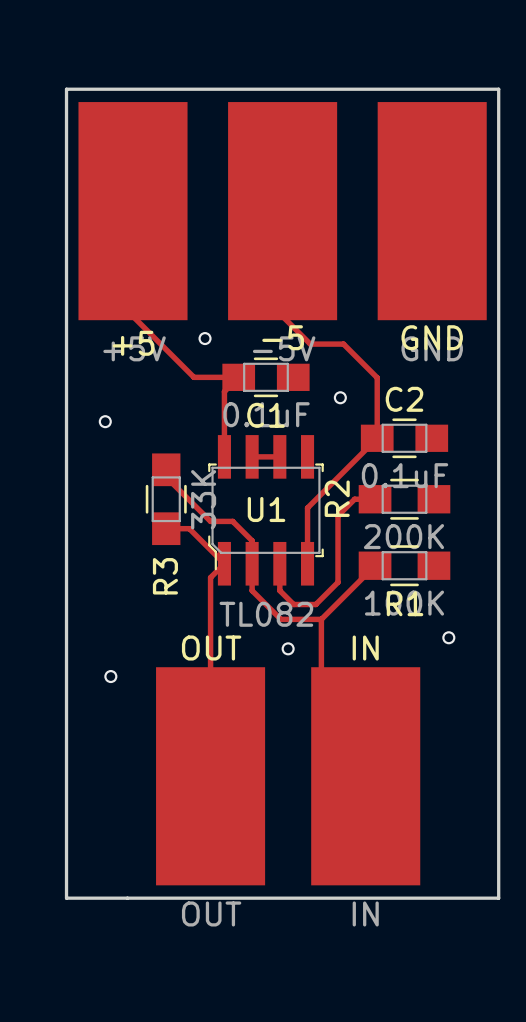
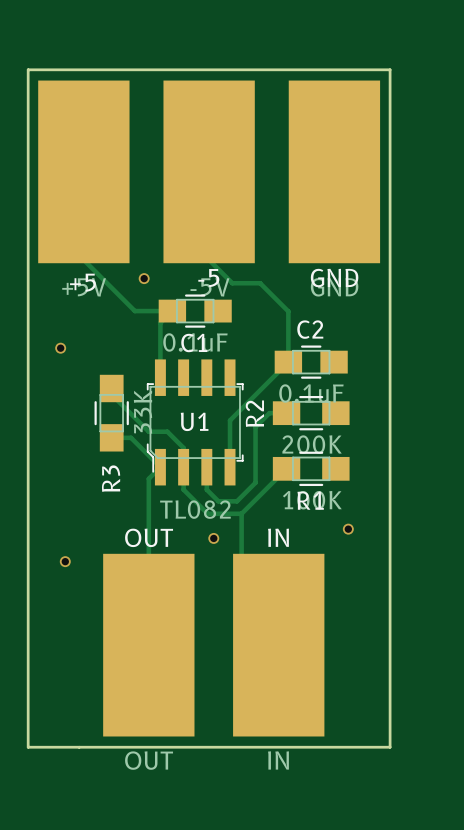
via: (340, 397) -> none
track: (252, 456) (279, 456) -> none

